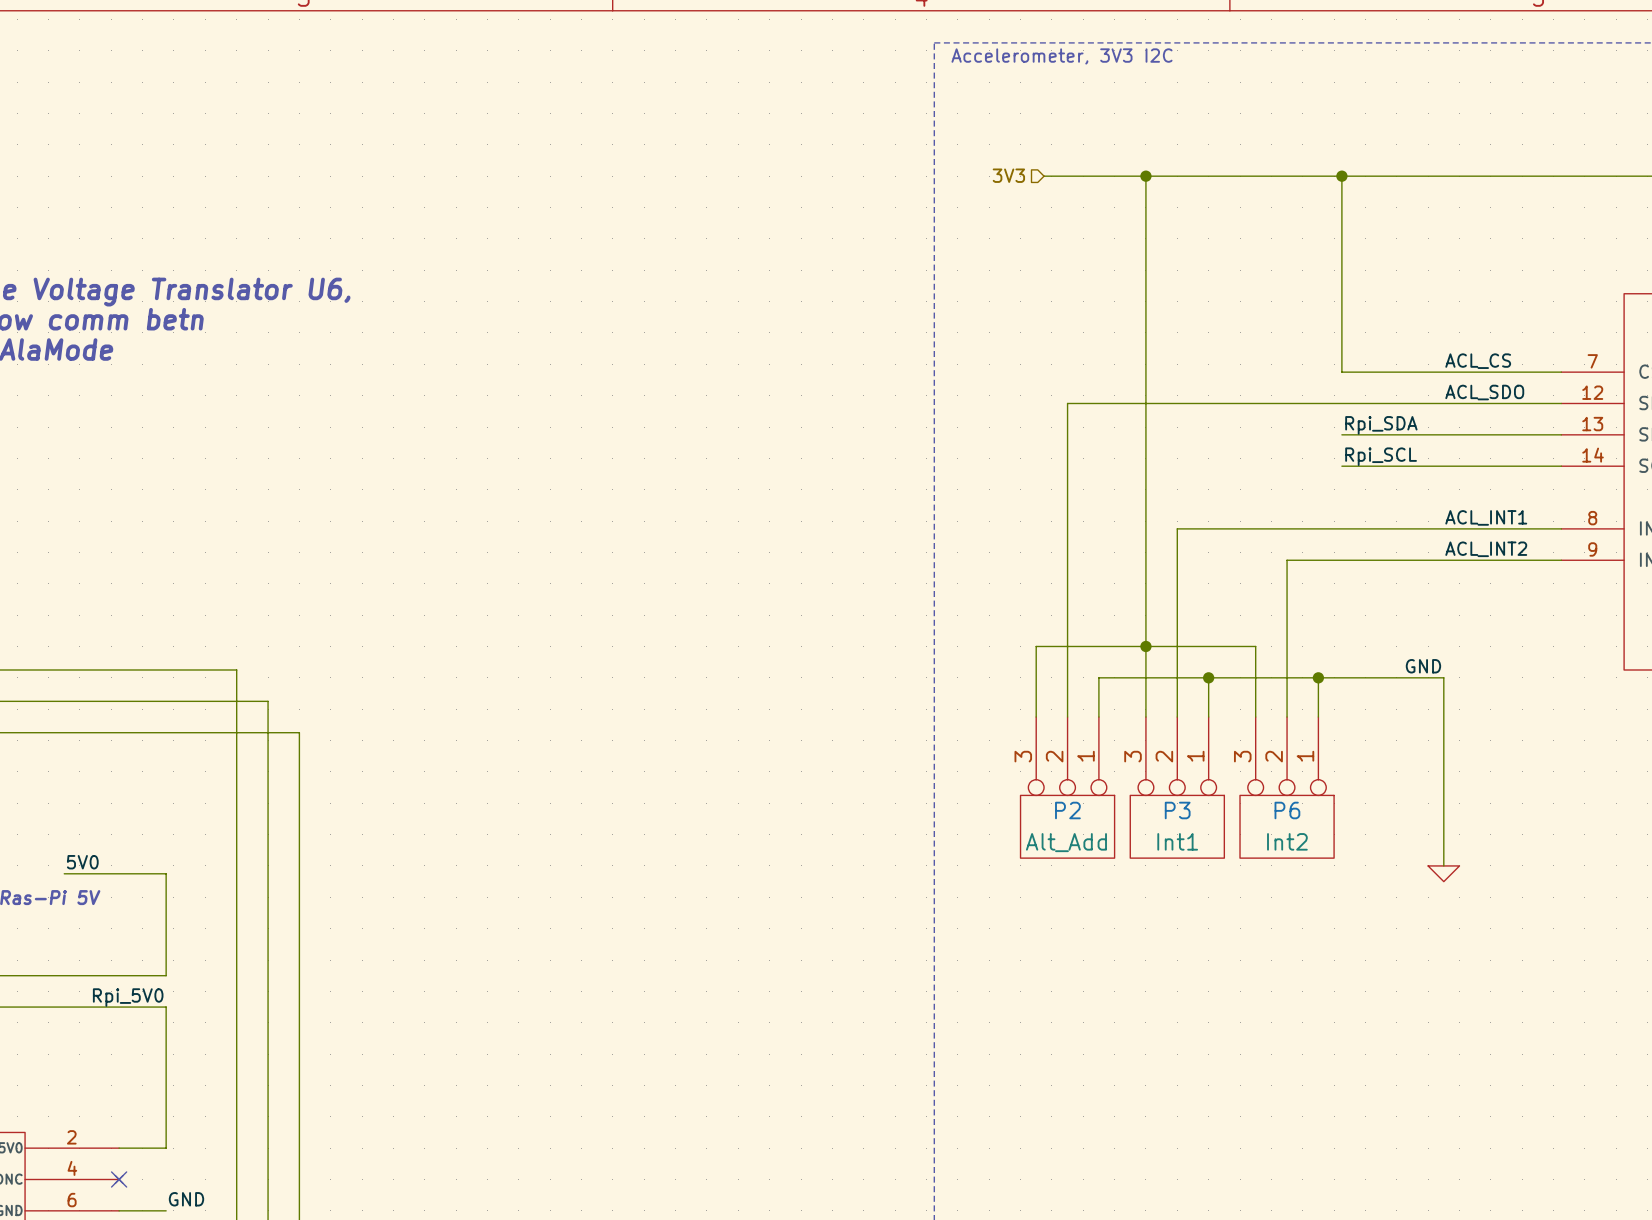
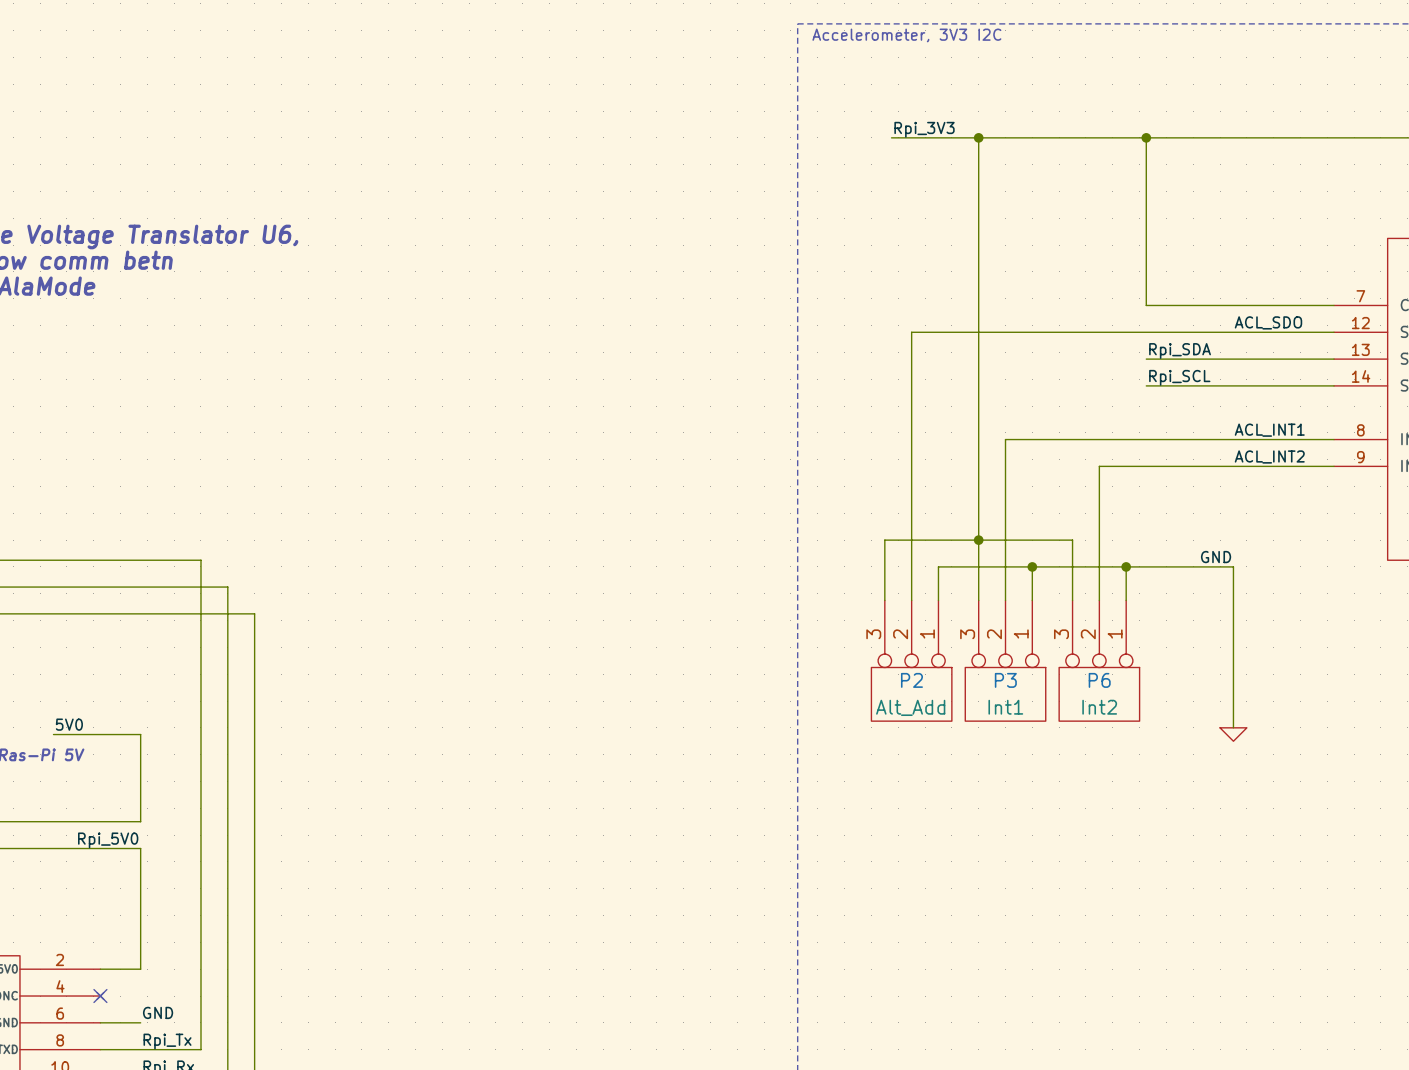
label: none -> Rpi_3V3 (924, 129)
hierarchical label: 3V3 (1008, 175) -> none
label: ACL_CS (1478, 361) -> none

